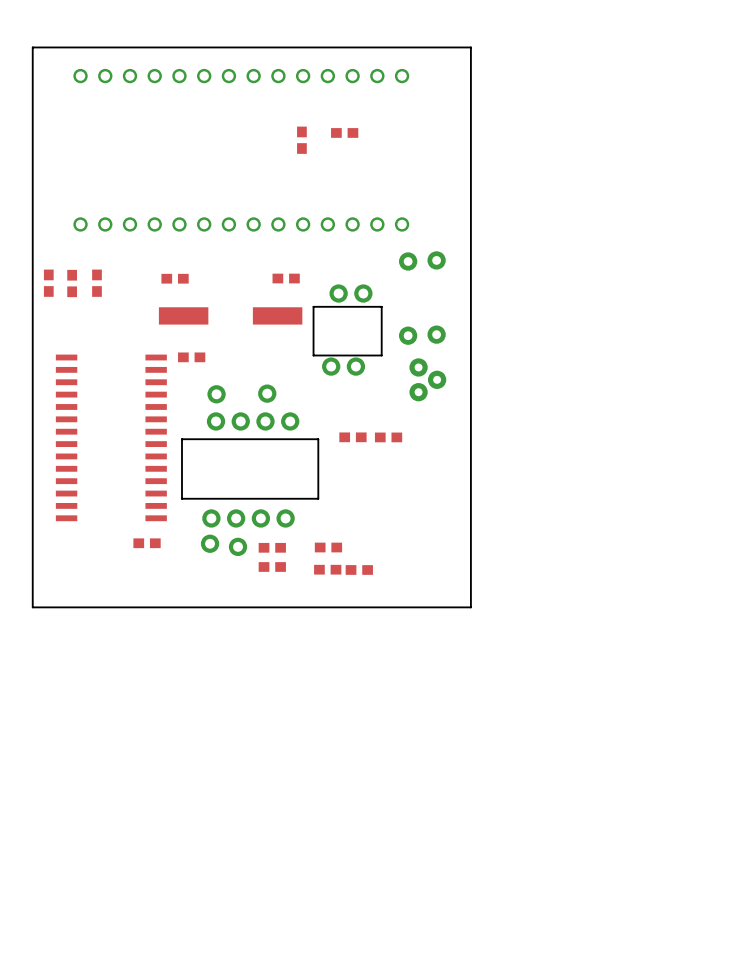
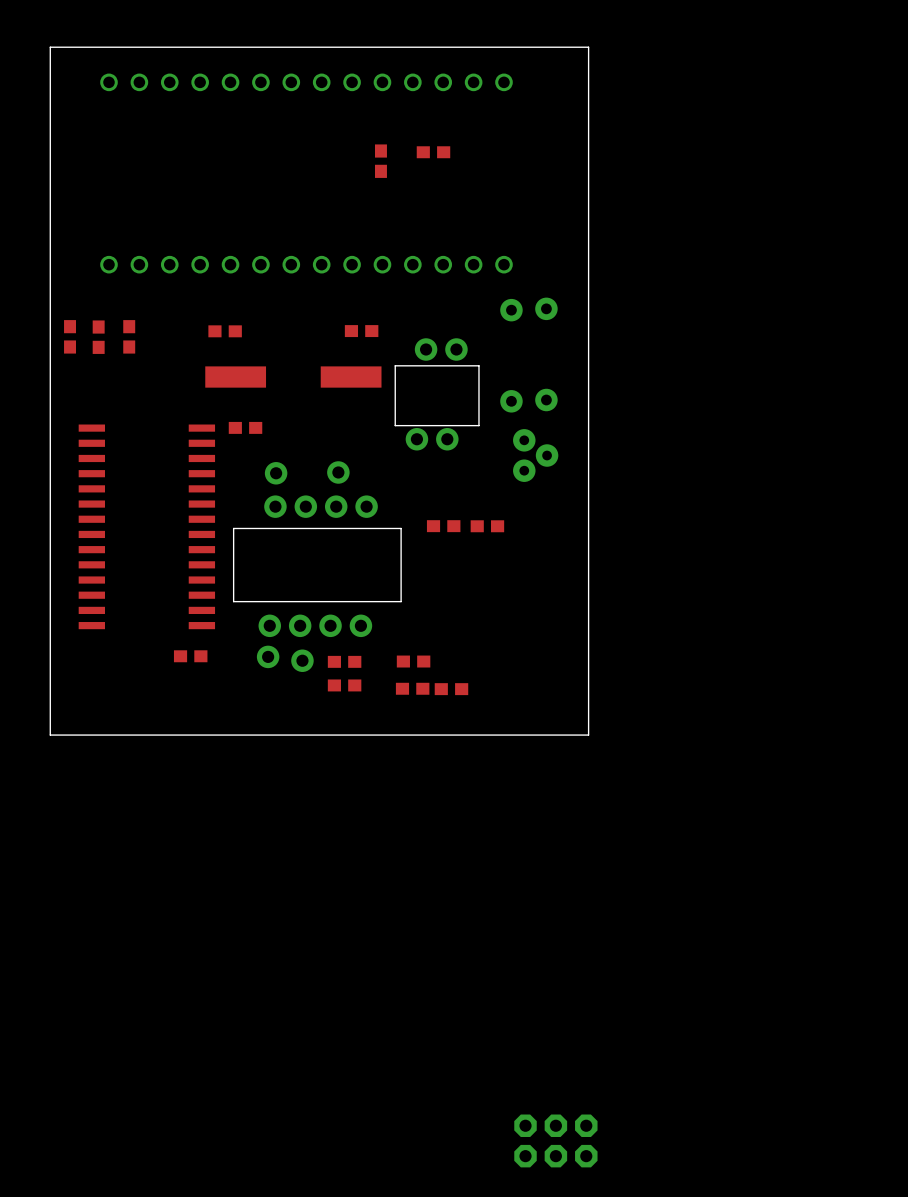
part: none -> (555, 1140)

